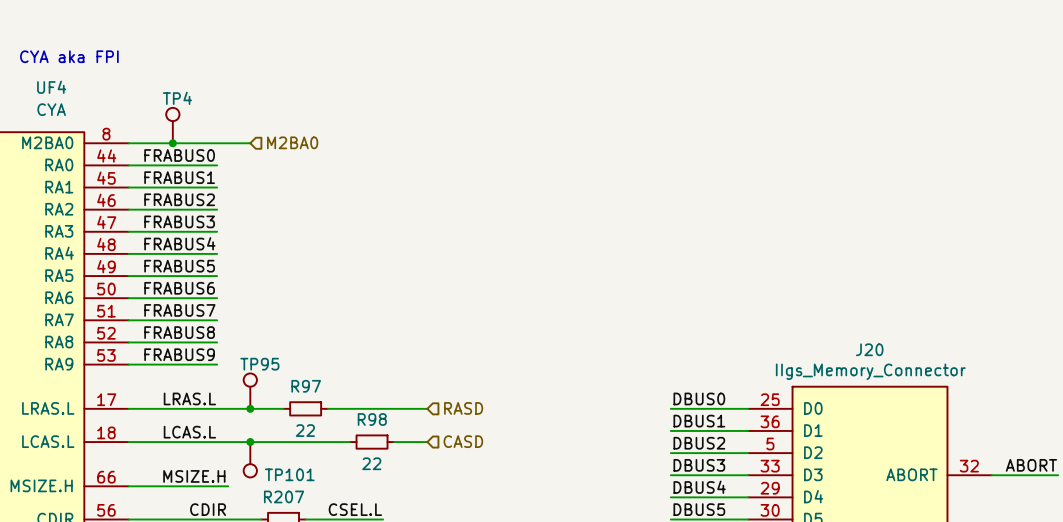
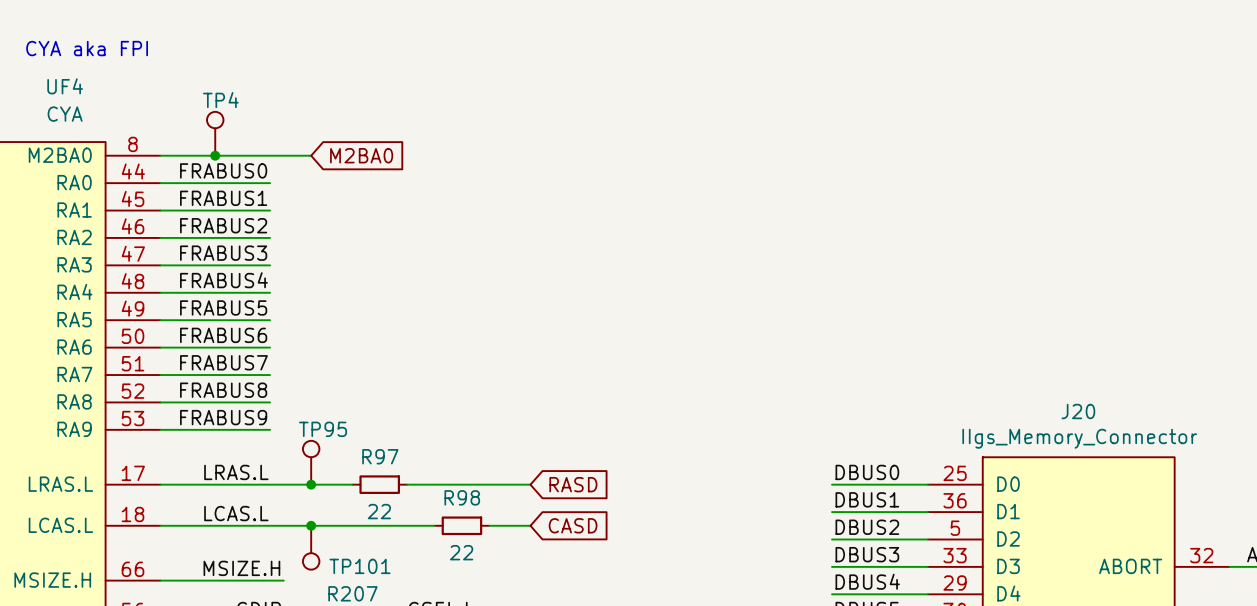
hierarchical label: M2BA0 (292, 142) -> none
global label: none -> M2BA0 (361, 155)
global label: none -> RASD (573, 484)
hierarchical label: RASD (463, 408) -> none
hierarchical label: CASD (463, 441) -> none
global label: none -> CASD (573, 525)

